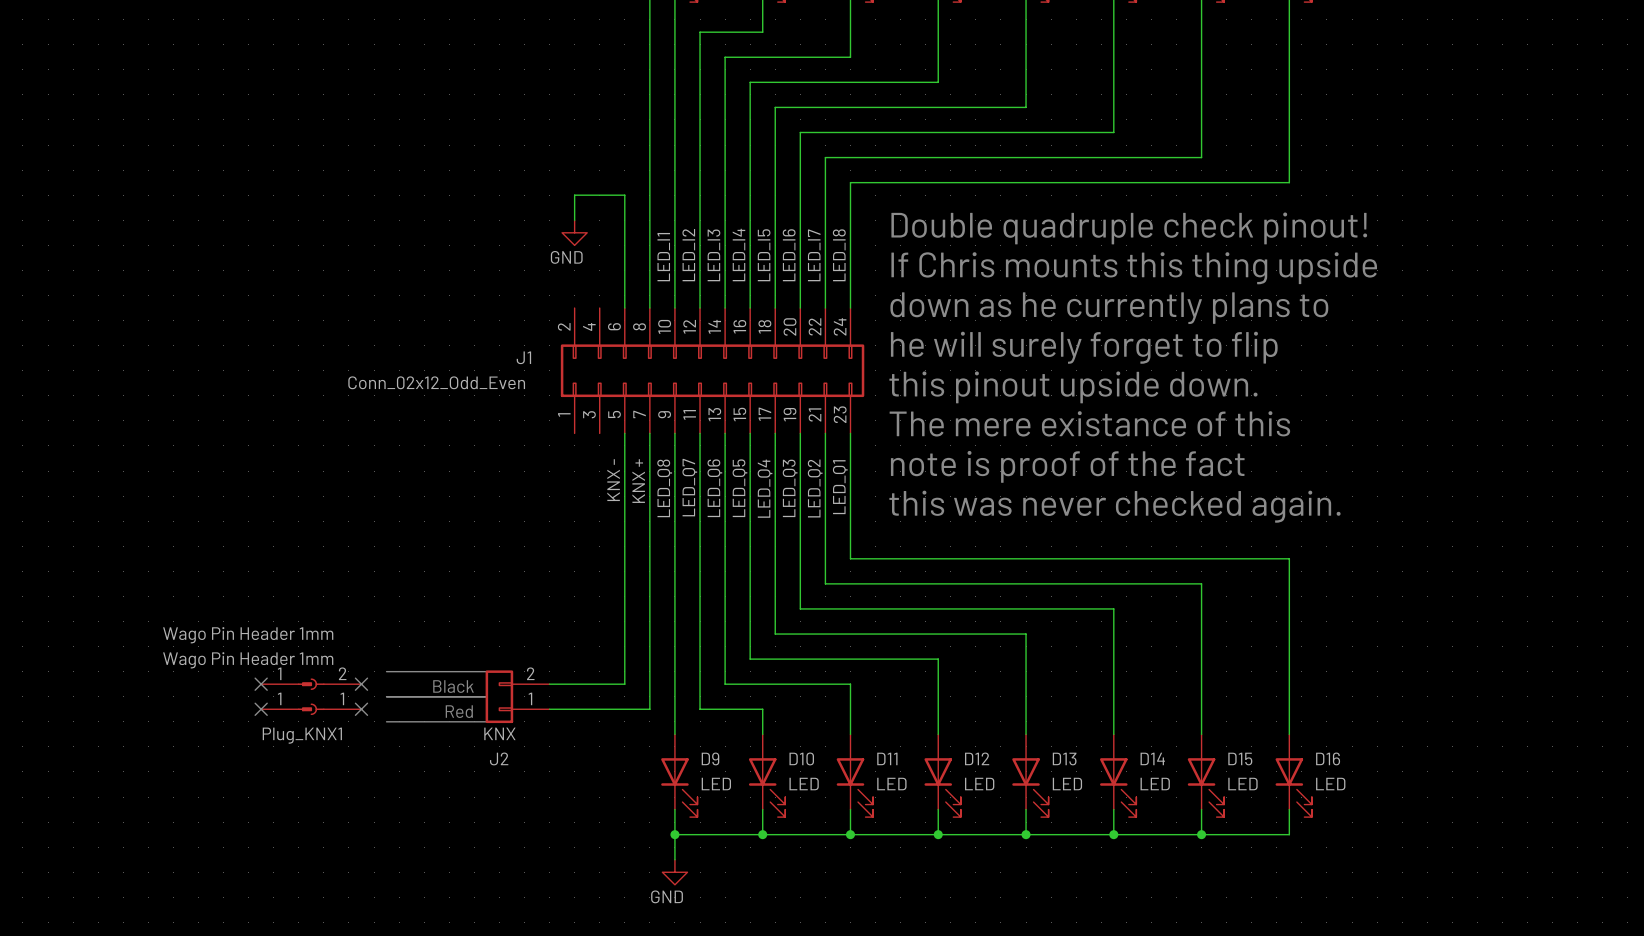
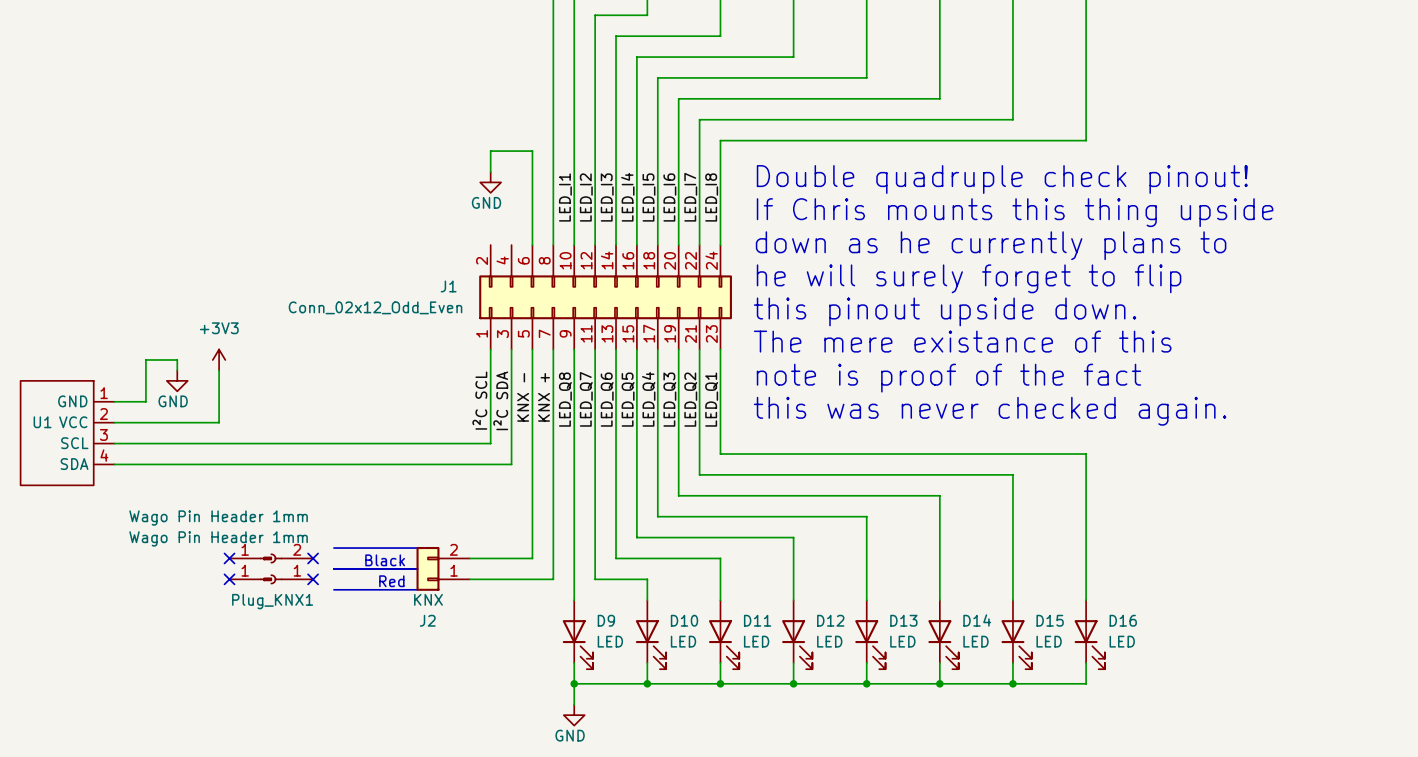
wire: none -> (490, 349) (490, 443) (114, 443)
wire: none -> (511, 349) (511, 464) (114, 464)
power symbol: none -> +3V3 (219, 359)
wire: none -> (177, 370) (177, 359) (145, 359) (145, 401) (114, 401)
wire: none -> (219, 370) (219, 422) (114, 422)
power symbol: none -> GND (177, 380)
label: none -> I²C SCL (479, 400)
label: none -> I²C SDA (500, 400)
U1: none -> (67, 433)

